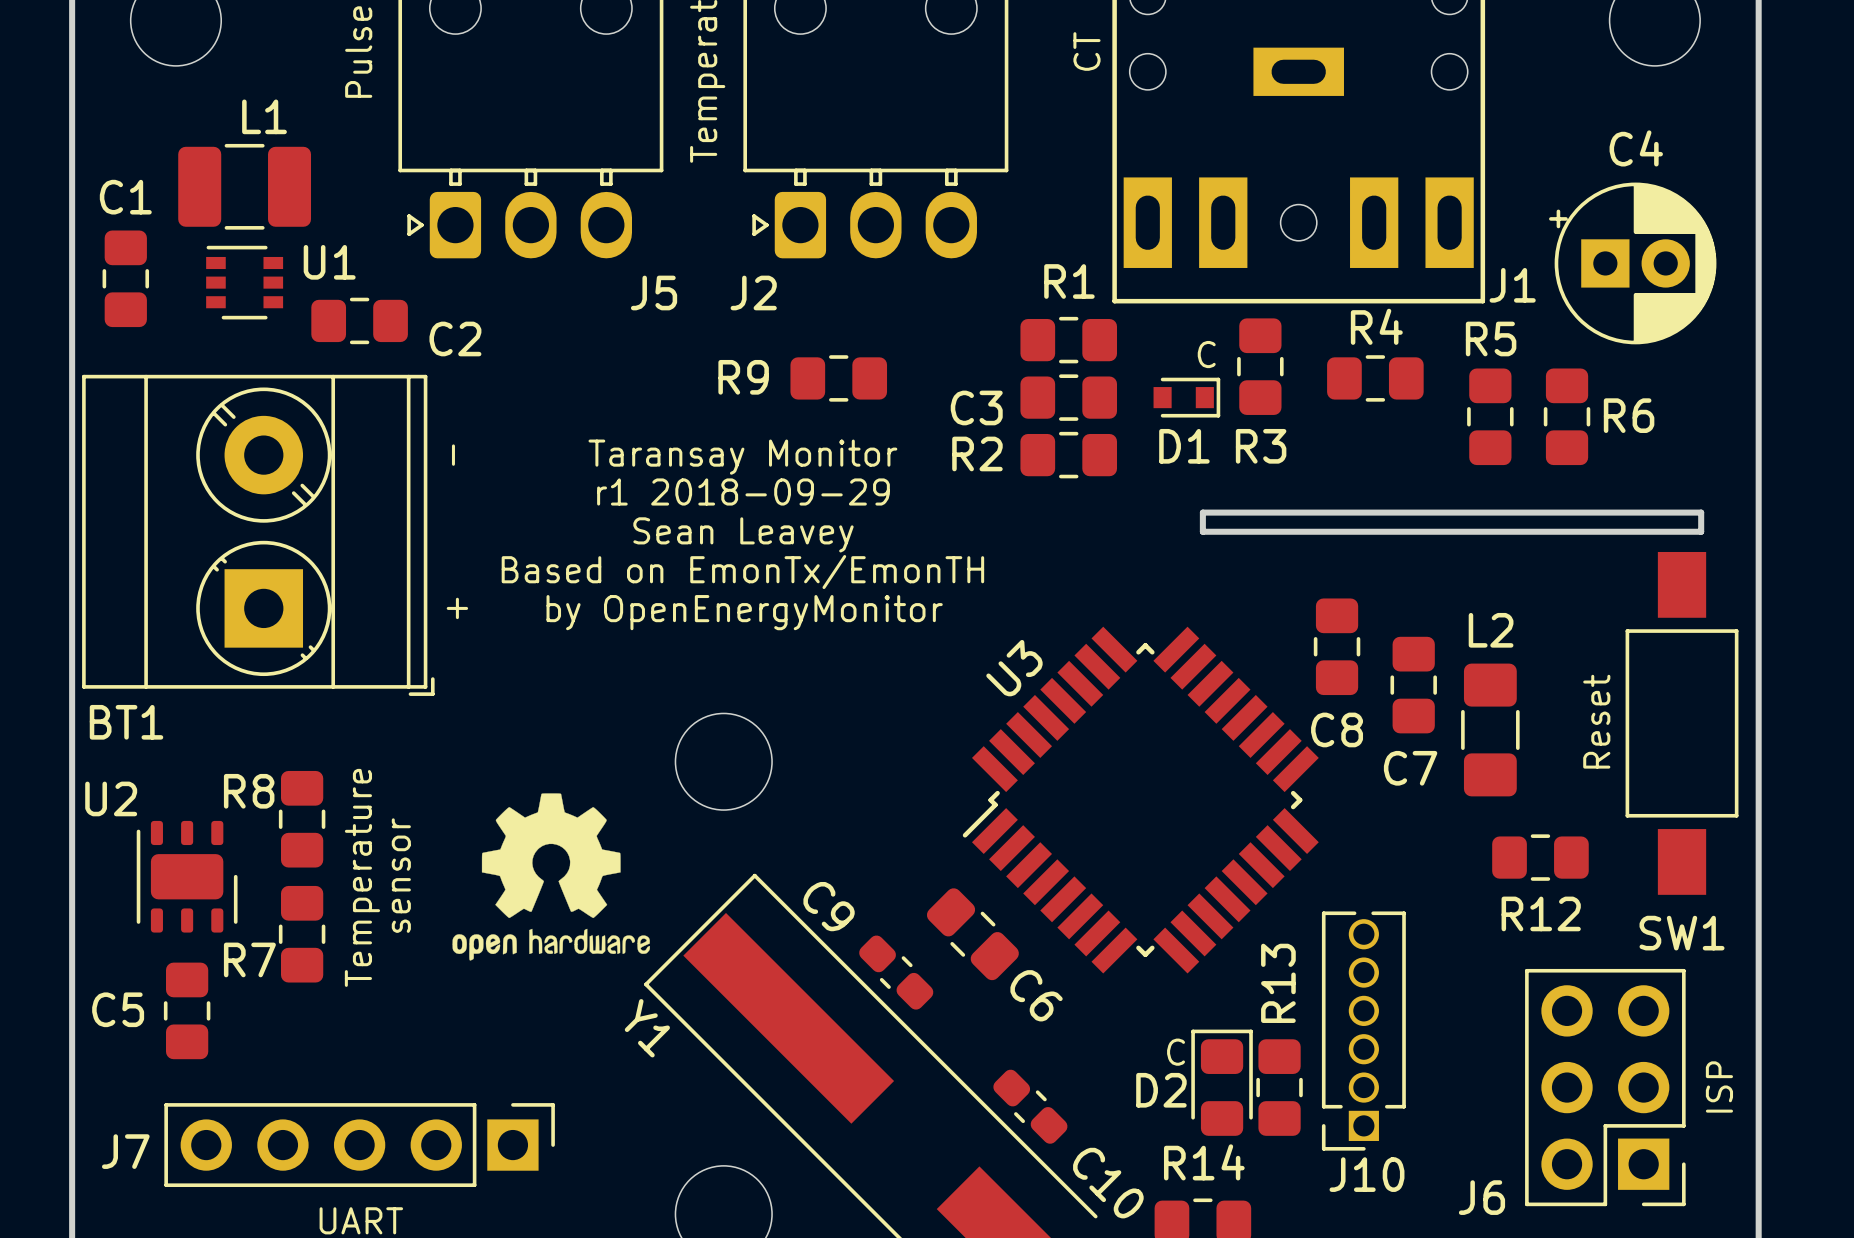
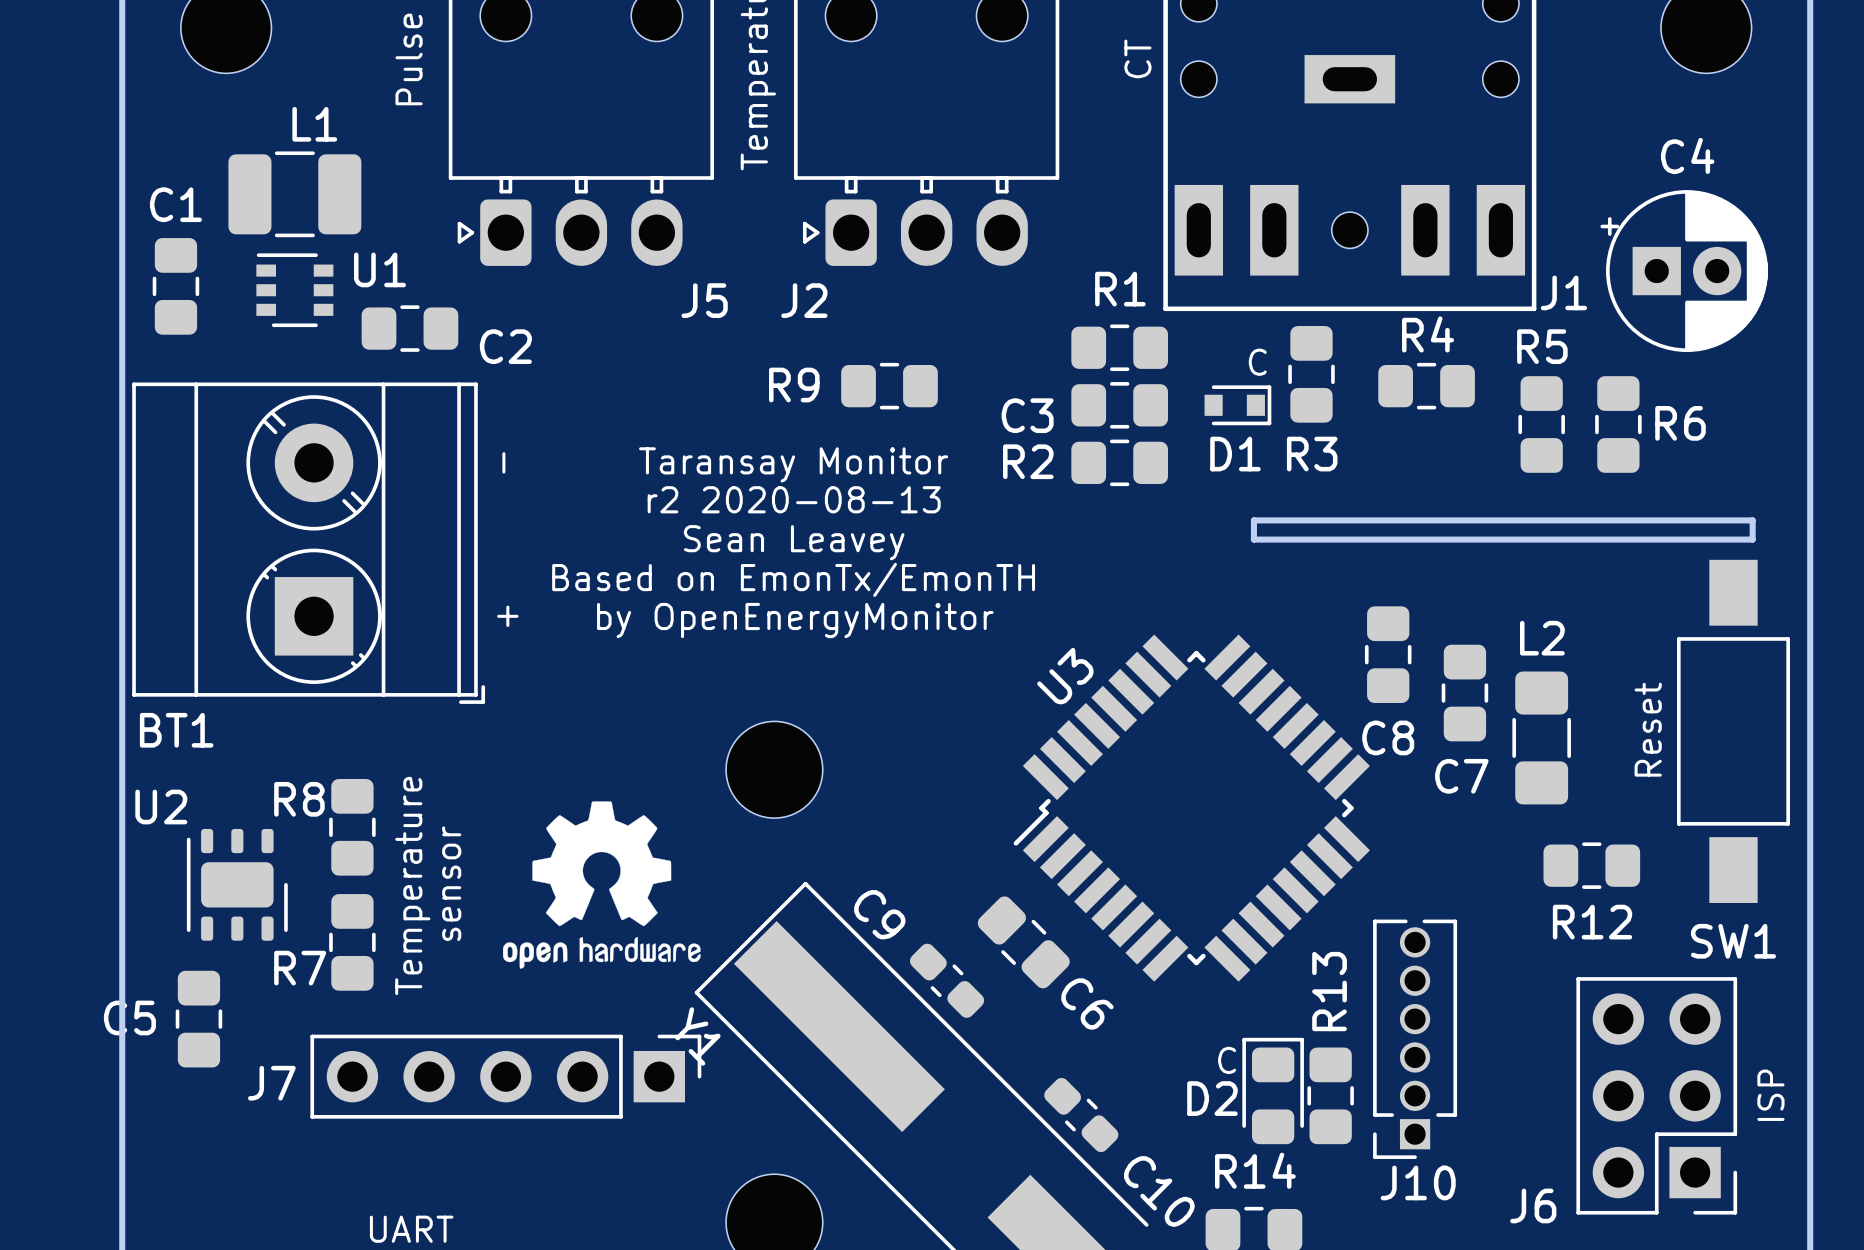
text: r1 2018-09-29 (743, 491) -> r2 2020-08-13 (794, 499)
C5 position: (187, 1010) -> (198, 1019)
J7 position: (359, 1145) -> (505, 1076)

